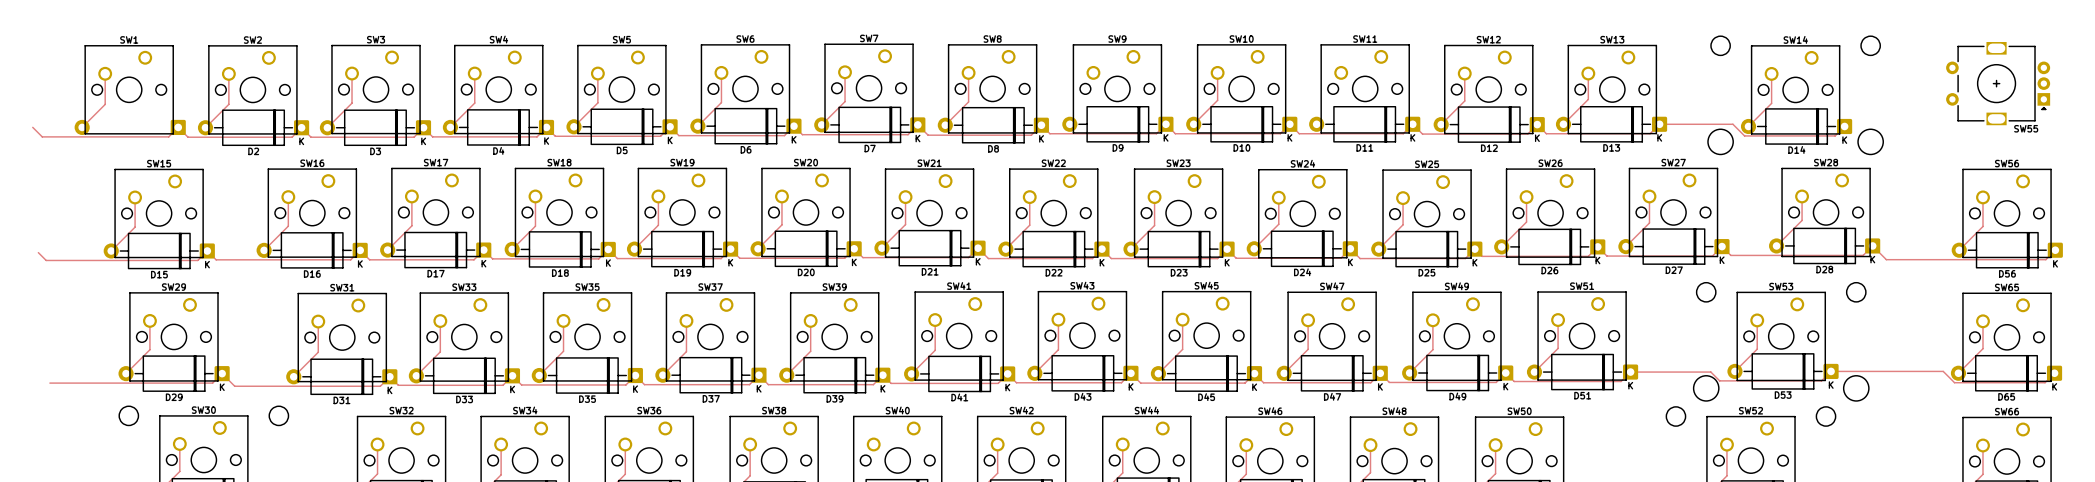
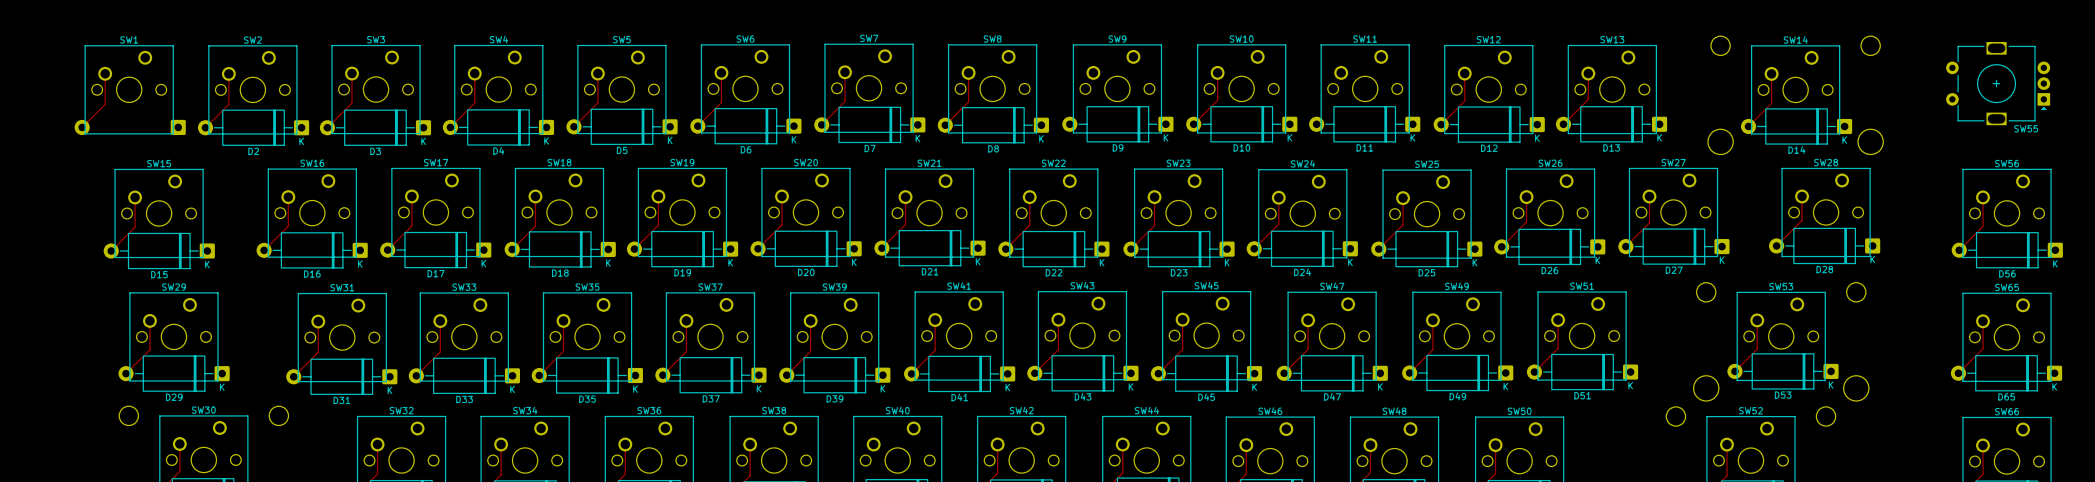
top track: (1844, 126) (1835, 135) (1744, 135) (1732, 124) (1659, 124) (1650, 133) (1546, 133) (1537, 124) (1527, 134) (1422, 134) (1412, 124) (1403, 133) (1299, 133) (1289, 124) (1280, 133) (1175, 133) (1165, 124) (1156, 133) (1049, 133) (1041, 125) (1031, 135) (928, 135) (917, 124) (908, 134) (802, 134) (793, 126) (784, 135) (678, 135) (670, 126) (660, 136) (555, 136) (546, 127) (537, 136) (432, 136) (423, 127) (414, 137) (311, 137) (301, 127) (292, 137) (188, 137) (178, 127) (168, 136) (42, 136) (32, 127) -> none
top track: (2055, 250) (2045, 259) (1886, 259) (1872, 245) (1863, 255) (1730, 255) (1721, 246) (1712, 256) (1606, 256) (1597, 246) (1588, 256) (1482, 256) (1474, 249) (1465, 258) (1360, 258) (1350, 248) (1340, 258) (1236, 258) (1227, 249) (1217, 258) (1111, 258) (1101, 249) (1092, 258) (988, 258) (978, 248) (968, 257) (862, 257) (854, 248) (844, 258) (739, 258) (730, 249) (721, 258) (617, 258) (608, 249) (598, 258) (492, 258) (483, 250) (474, 259) (369, 259) (360, 250) (350, 259) (216, 259) (207, 251) (197, 260) (46, 260) (38, 252) -> none
top track: (2054, 373) (2045, 382) (1954, 382) (1943, 371) (1831, 371) (1821, 380) (1719, 380) (1710, 372) (1630, 372) (1621, 381) (1514, 381) (1505, 372) (1496, 382) (1389, 382) (1380, 373) (1370, 382) (1263, 382) (1254, 373) (1245, 383) (1140, 383) (1130, 373) (1121, 382) (1016, 382) (1007, 373) (998, 383) (891, 383) (882, 375) (873, 384) (768, 384) (758, 375) (749, 384) (644, 384) (635, 375) (625, 384) (521, 384) (512, 375) (502, 385) (398, 385) (389, 376) (380, 386) (234, 386) (222, 373) (212, 383) (49, 383) -> none

